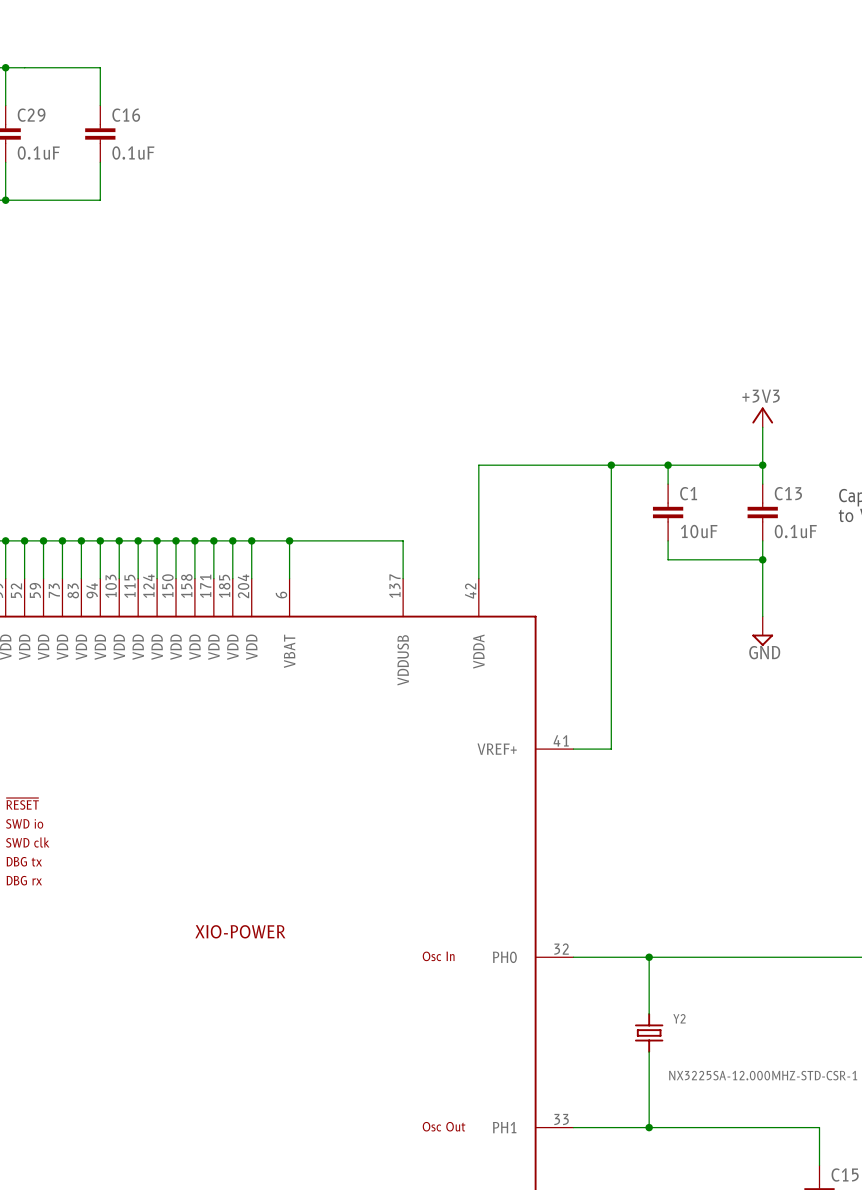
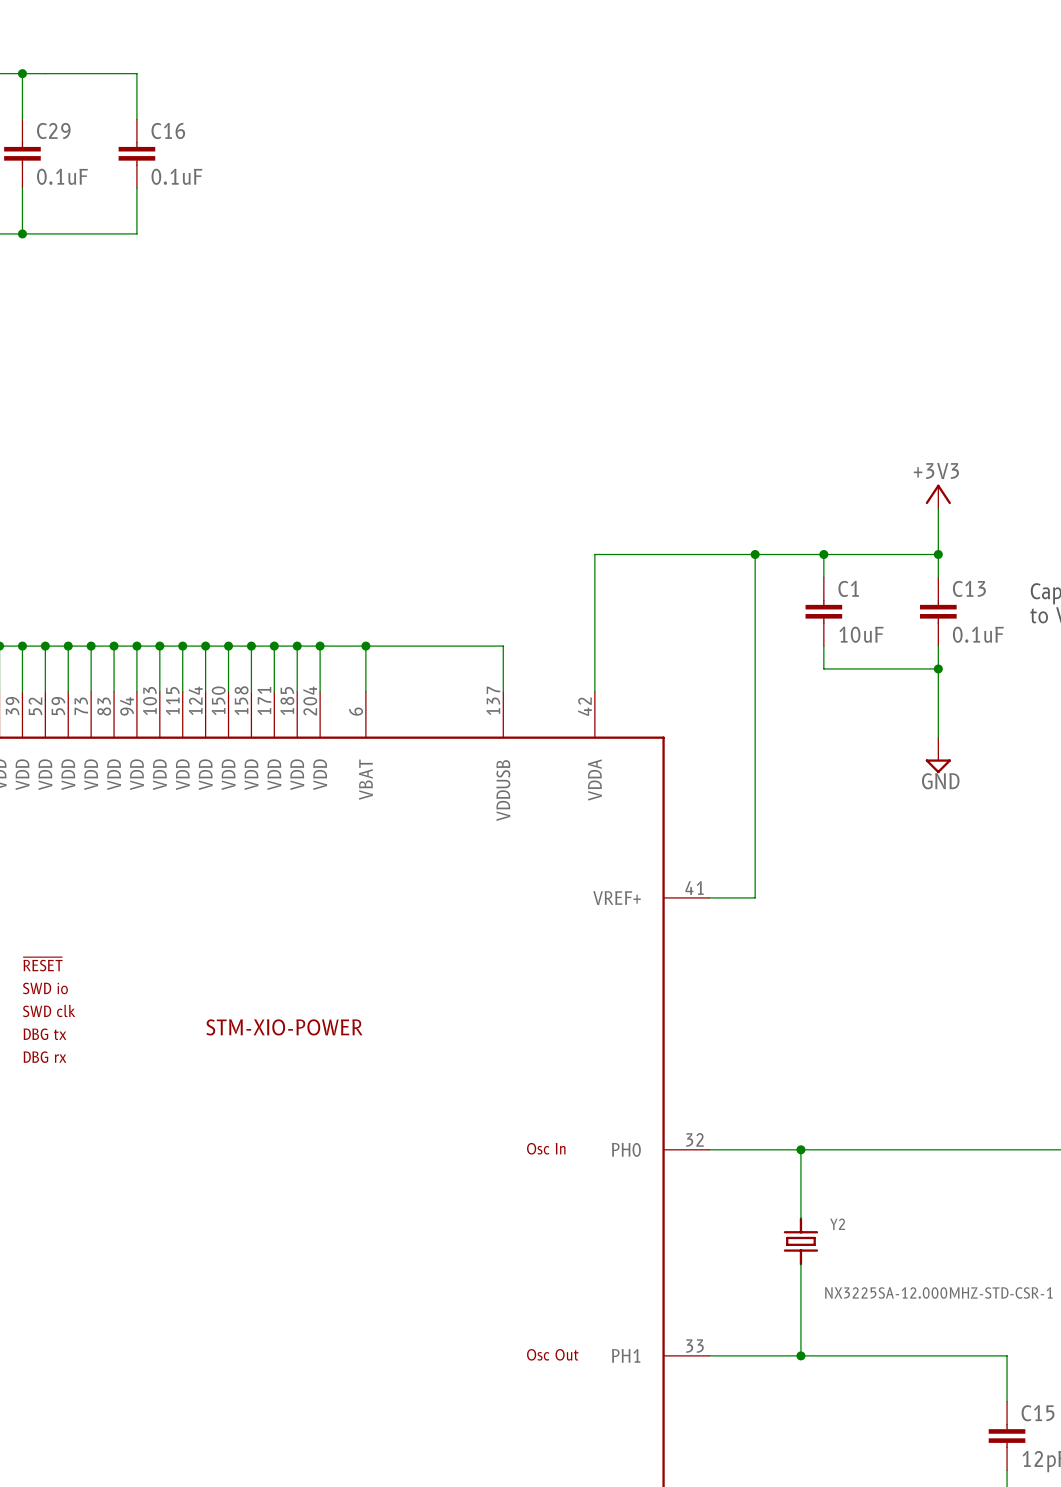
XIO-POWER name: XIO-POWER (240, 931) -> STM-XIO-POWER (284, 1027)

